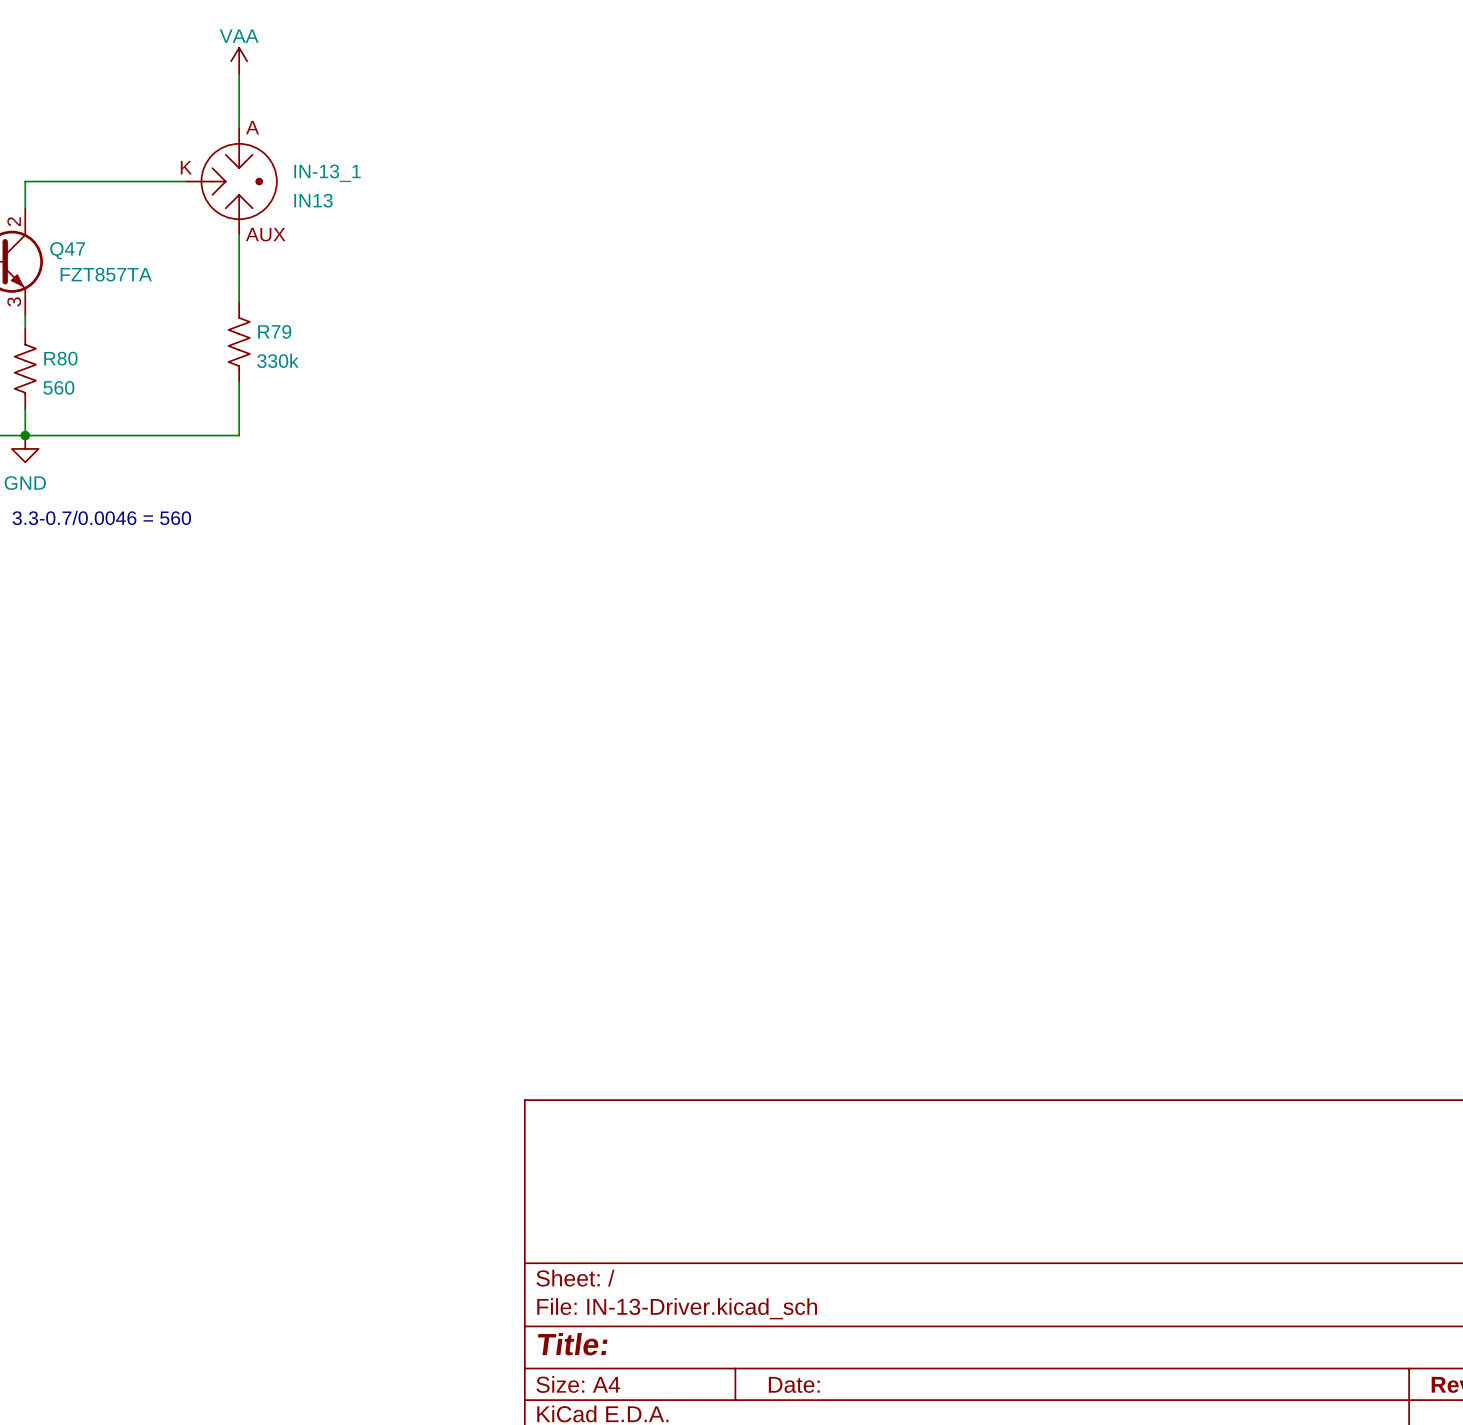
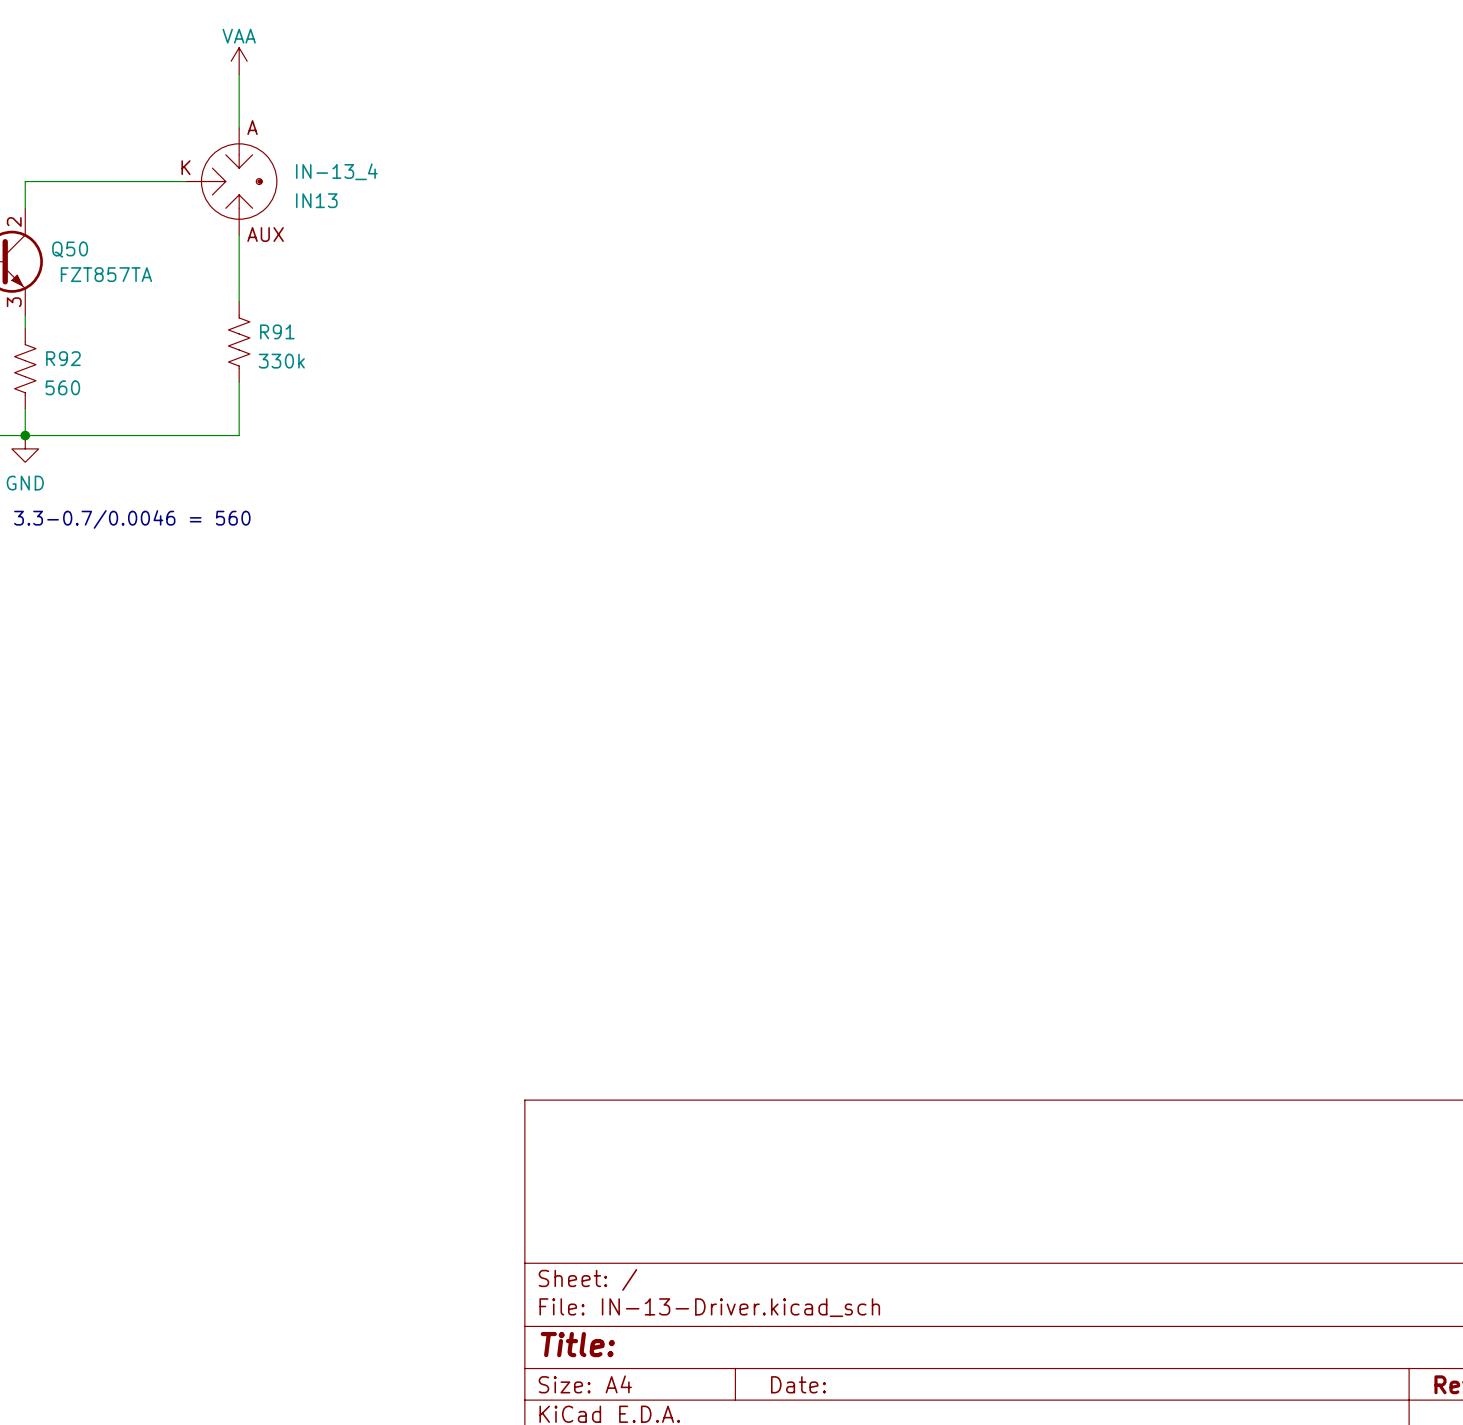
IN-13_1 name: IN-13_1 (327, 173) -> IN-13_4 (336, 171)
Q47 name: Q47 (67, 250) -> Q50 (70, 249)
R79 name: R79 (274, 331) -> R91 (277, 331)
R80 name: R80 (60, 358) -> R92 (63, 358)

